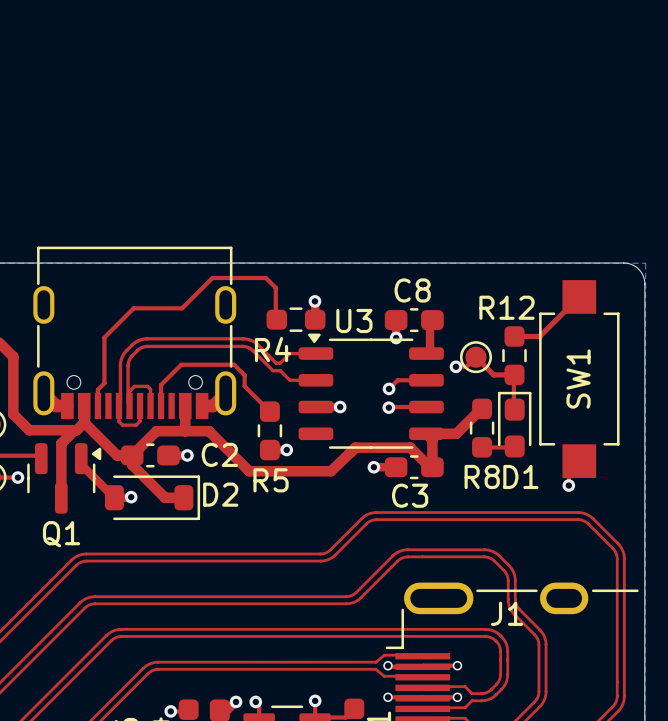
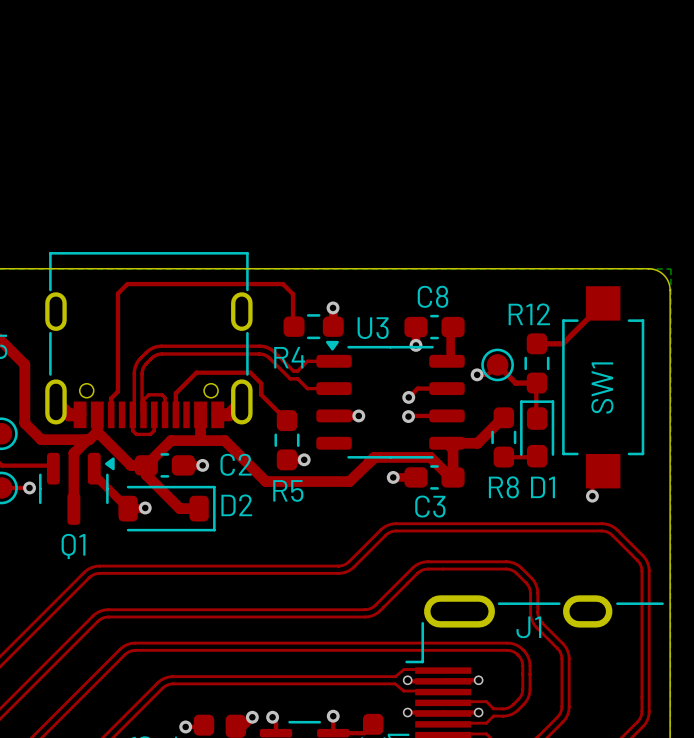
top track: (212, 278) (182, 308) (133, 308) (104, 337) -> (228, 284) (127, 284) (117, 293) (117, 344)

